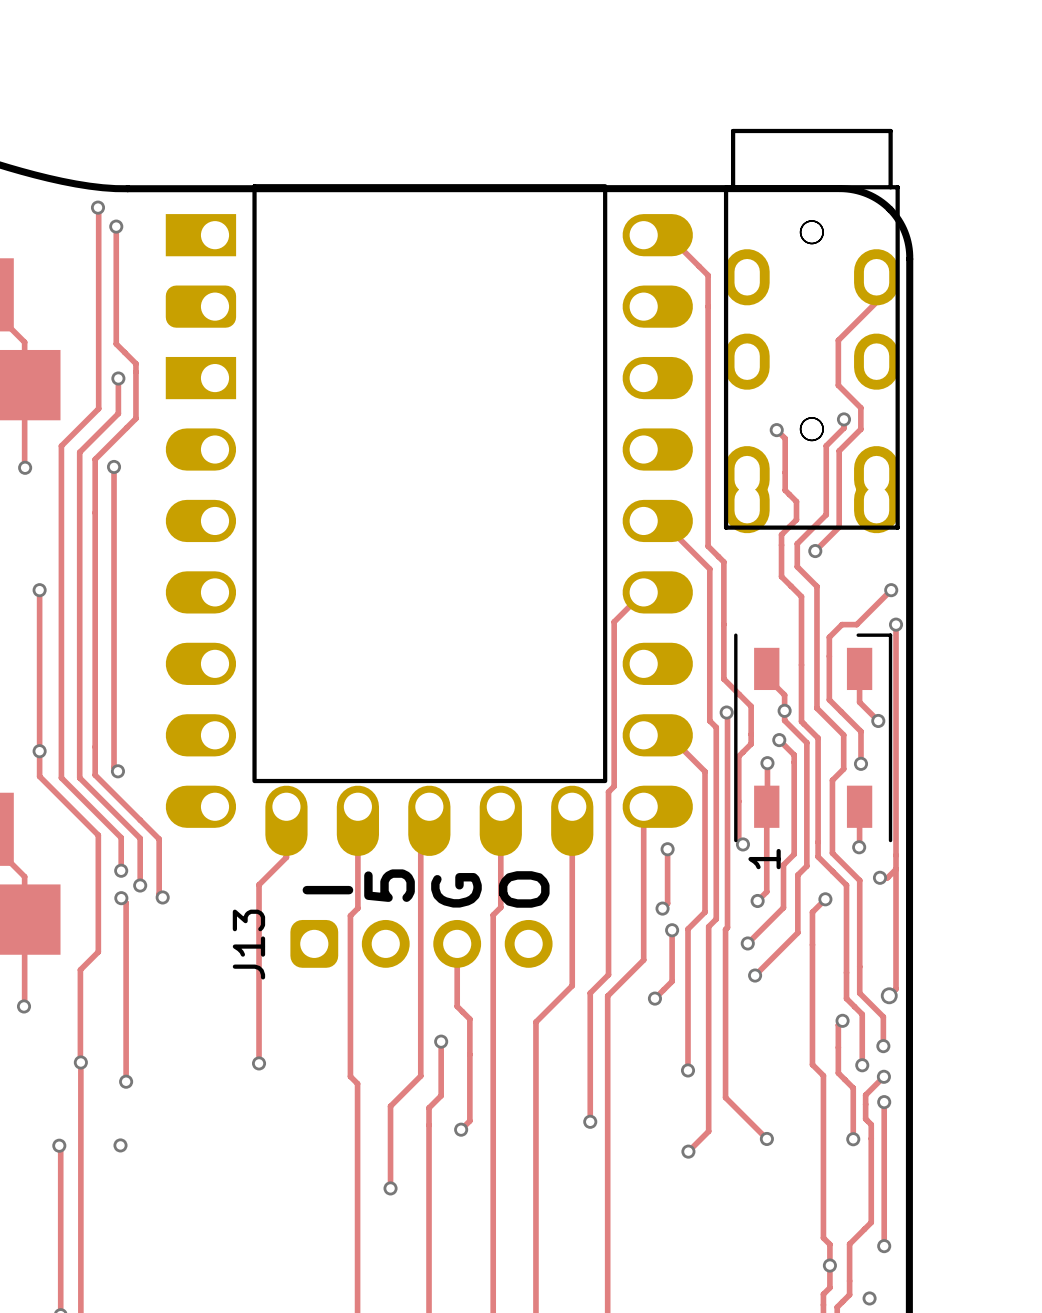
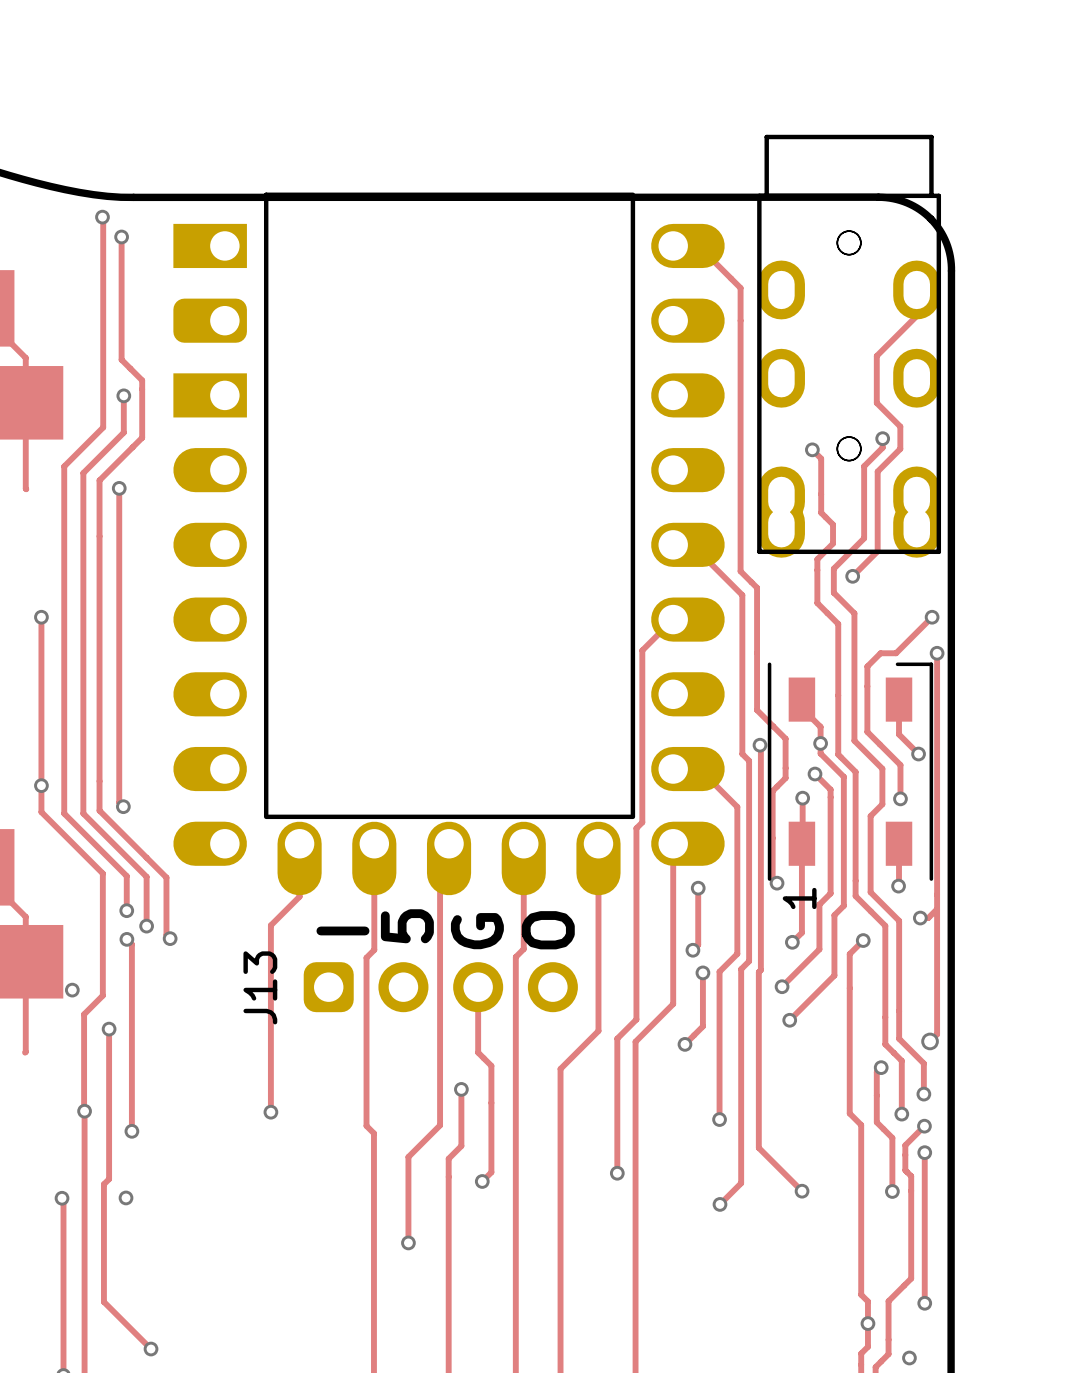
via: (25, 467) -> none
via: none -> (72, 990)
track: none -> (109, 1029) (109, 1179) (103, 1184) (103, 1301) (151, 1349)
via: none -> (109, 1029)
via: (24, 1006) -> none
via: none -> (151, 1349)

